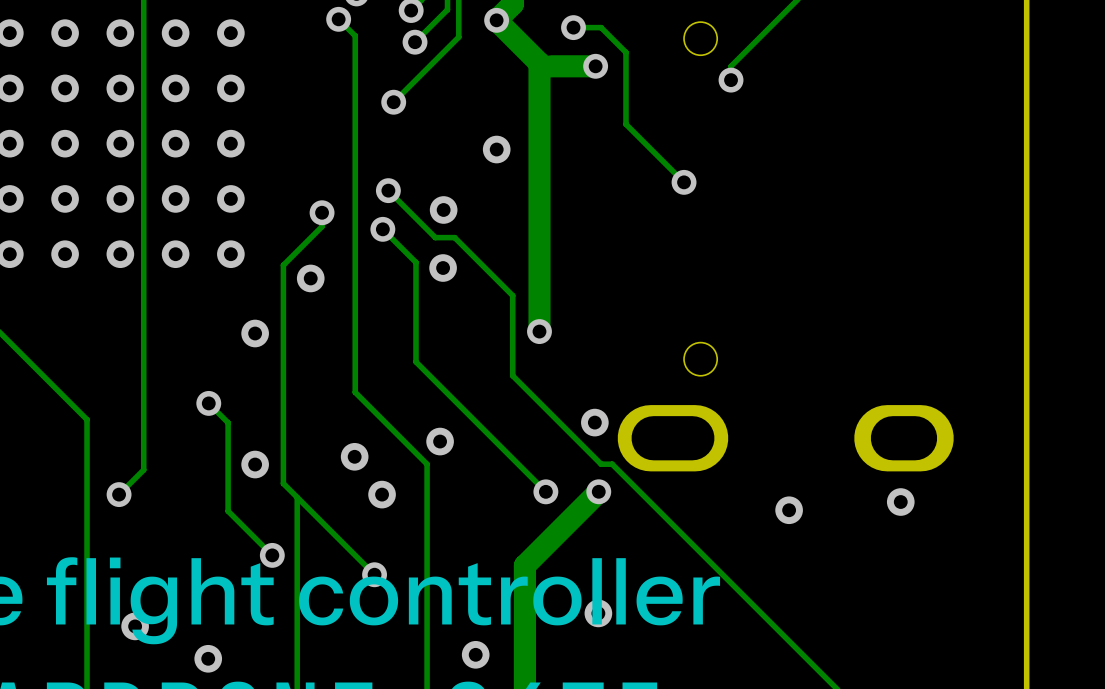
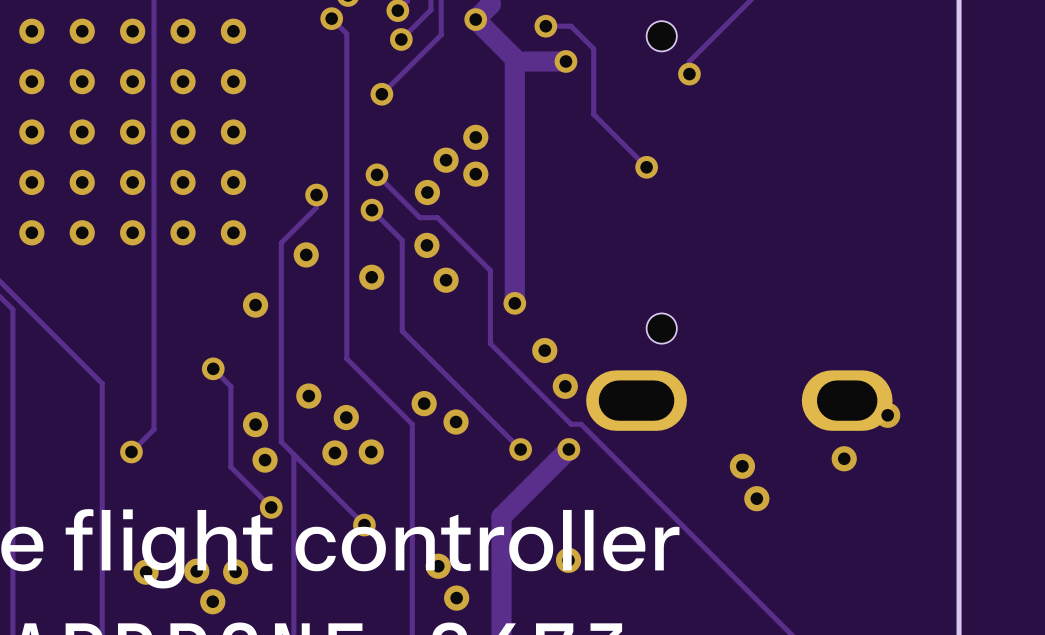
via: none -> (446, 160)
via: none -> (475, 174)
via: none -> (371, 277)
via: none -> (446, 280)
via: none -> (544, 350)
via: none -> (308, 396)
via: none -> (887, 415)
via: none -> (456, 422)
via: none -> (334, 452)
via: none -> (265, 460)
via: none -> (756, 498)
via: none -> (438, 566)
via: none -> (196, 571)
via: none -> (235, 571)

